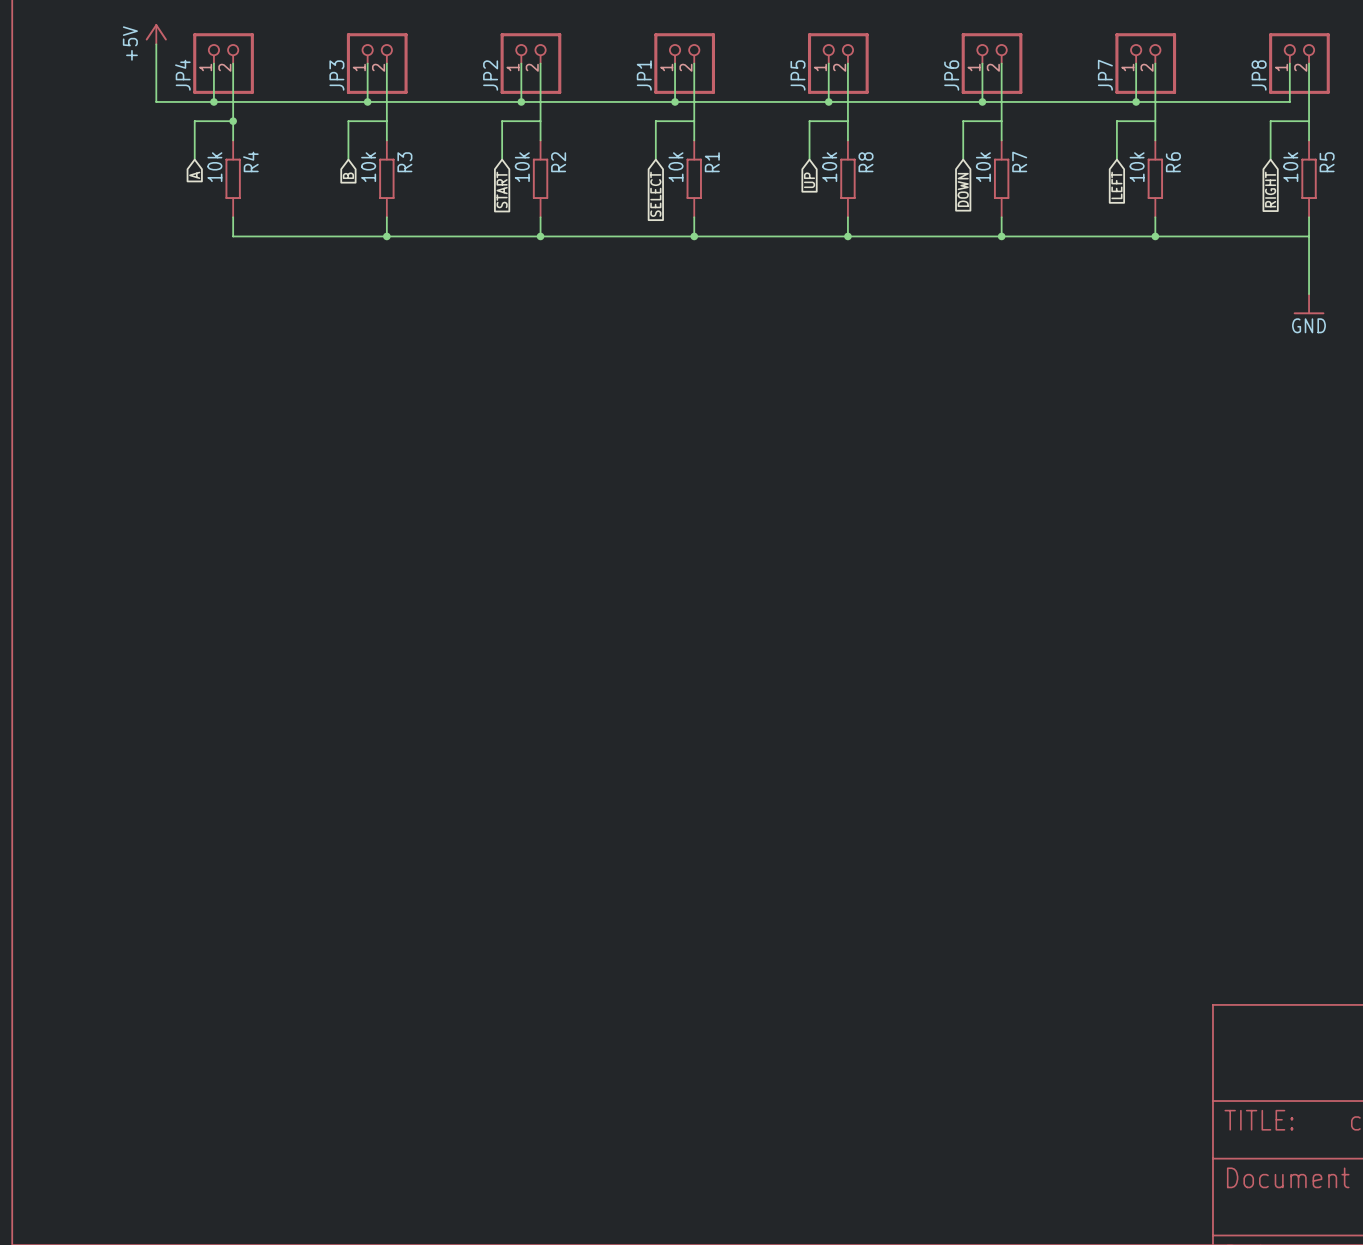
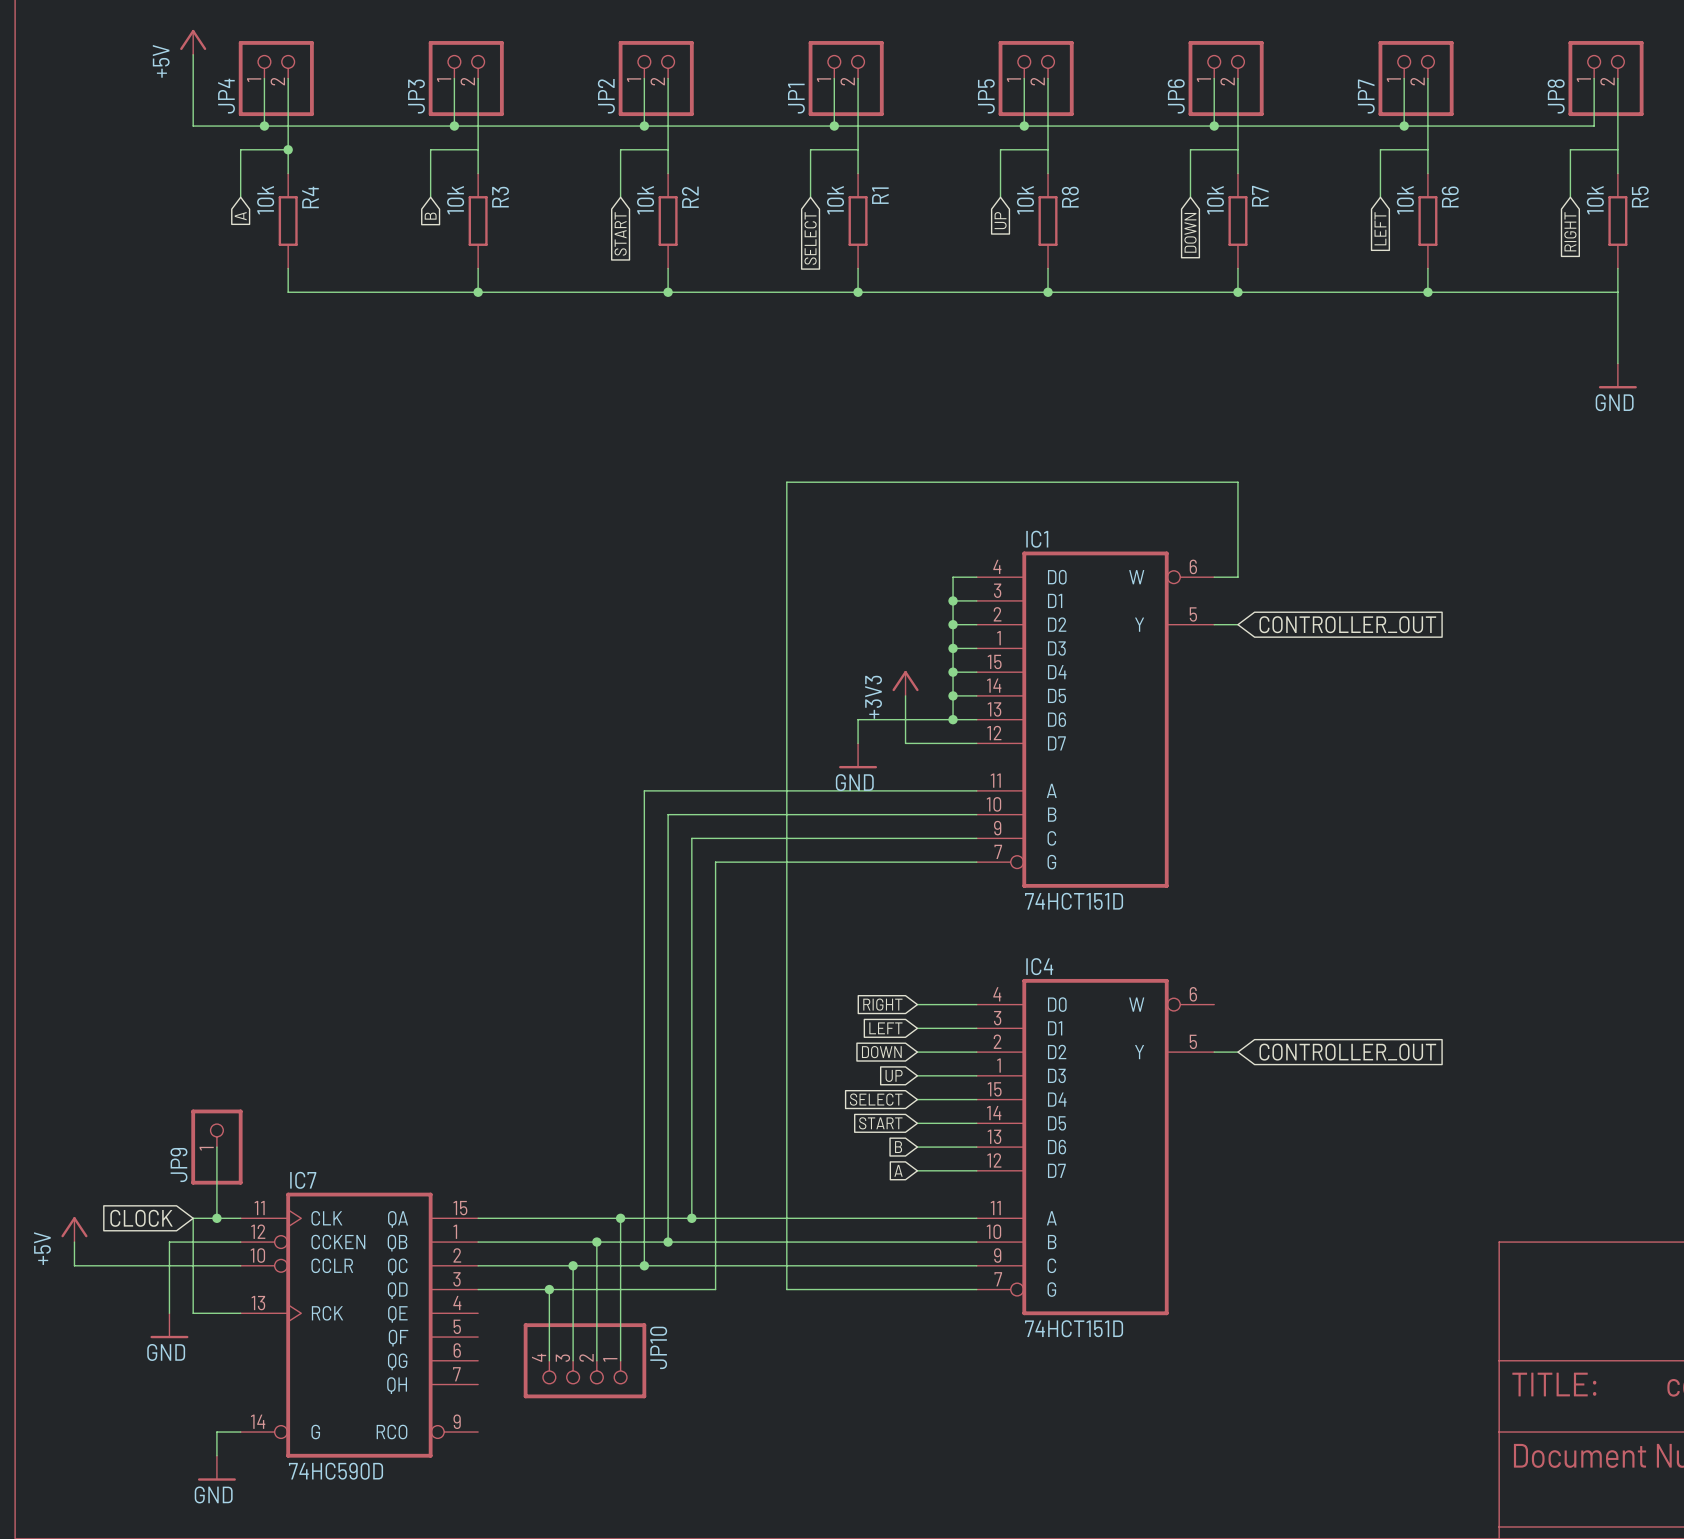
wire: none -> (976, 577) (953, 577) (953, 719)
wire: none -> (1214, 577) (1237, 577) (1237, 482) (786, 482) (786, 1289) (976, 1289)
wire: none -> (953, 600) (976, 600)
junction: none -> (953, 600)
wire: none -> (953, 624) (976, 624)
junction: none -> (953, 624)
wire: none -> (1214, 624) (1237, 624)
global label: none -> CONTROLLER_OUT (1347, 624)
wire: none -> (953, 648) (976, 648)
junction: none -> (953, 648)
wire: none -> (953, 672) (976, 672)
junction: none -> (953, 672)
power symbol: none -> +3V3 (905, 683)
wire: none -> (905, 695) (905, 743) (976, 743)
wire: none -> (953, 695) (976, 695)
junction: none -> (953, 695)
junction: none -> (953, 719)
wire: none -> (976, 719) (858, 719) (858, 743)
IC1: none -> 74HCT151D (1095, 719)
power symbol: none -> GND (858, 755)
wire: none -> (976, 790) (644, 790) (644, 1265)
wire: none -> (976, 814) (668, 814) (668, 1242)
wire: none -> (976, 838) (691, 838) (691, 1218)
wire: none -> (976, 862) (715, 862) (715, 1289) (478, 1289)
global label: none -> RIGHT (882, 1004)
wire: none -> (917, 1004) (976, 1004)
global label: none -> LEFT (885, 1028)
wire: none -> (917, 1028) (976, 1028)
global label: none -> DOWN (881, 1052)
wire: none -> (917, 1052) (976, 1052)
wire: none -> (1214, 1052) (1237, 1052)
global label: none -> CONTROLLER_OUT (1347, 1052)
global label: none -> UP (894, 1075)
wire: none -> (917, 1075) (976, 1075)
global label: none -> SELECT (876, 1099)
wire: none -> (917, 1099) (976, 1099)
global label: none -> START (880, 1123)
wire: none -> (917, 1123) (976, 1123)
wire: none -> (216, 1147) (216, 1218)
JP9: none -> (216, 1147)
global label: none -> B (898, 1147)
wire: none -> (917, 1147) (976, 1147)
IC4: none -> 74HCT151D (1095, 1147)
global label: none -> A (898, 1170)
wire: none -> (917, 1170) (976, 1170)
global label: none -> CLOCK (141, 1218)
junction: none -> (216, 1218)
wire: none -> (240, 1218) (193, 1218) (193, 1313) (240, 1313)
wire: none -> (478, 1218) (976, 1218)
wire: none -> (620, 1218) (620, 1360)
junction: none -> (620, 1218)
junction: none -> (691, 1218)
power symbol: none -> +5V (74, 1229)
wire: none -> (74, 1242) (74, 1265) (240, 1265)
wire: none -> (240, 1242) (169, 1242) (169, 1313)
wire: none -> (478, 1242) (976, 1242)
wire: none -> (596, 1242) (596, 1360)
junction: none -> (596, 1242)
junction: none -> (668, 1242)
wire: none -> (478, 1265) (976, 1265)
wire: none -> (573, 1265) (573, 1360)
junction: none -> (573, 1265)
junction: none -> (644, 1265)
wire: none -> (549, 1289) (549, 1360)
junction: none -> (549, 1289)
power symbol: none -> GND (169, 1325)
IC7: none -> 74HC590D (359, 1325)
JP10: none -> (584, 1360)
wire: none -> (240, 1432) (216, 1432) (216, 1455)
power symbol: none -> GND (216, 1468)

